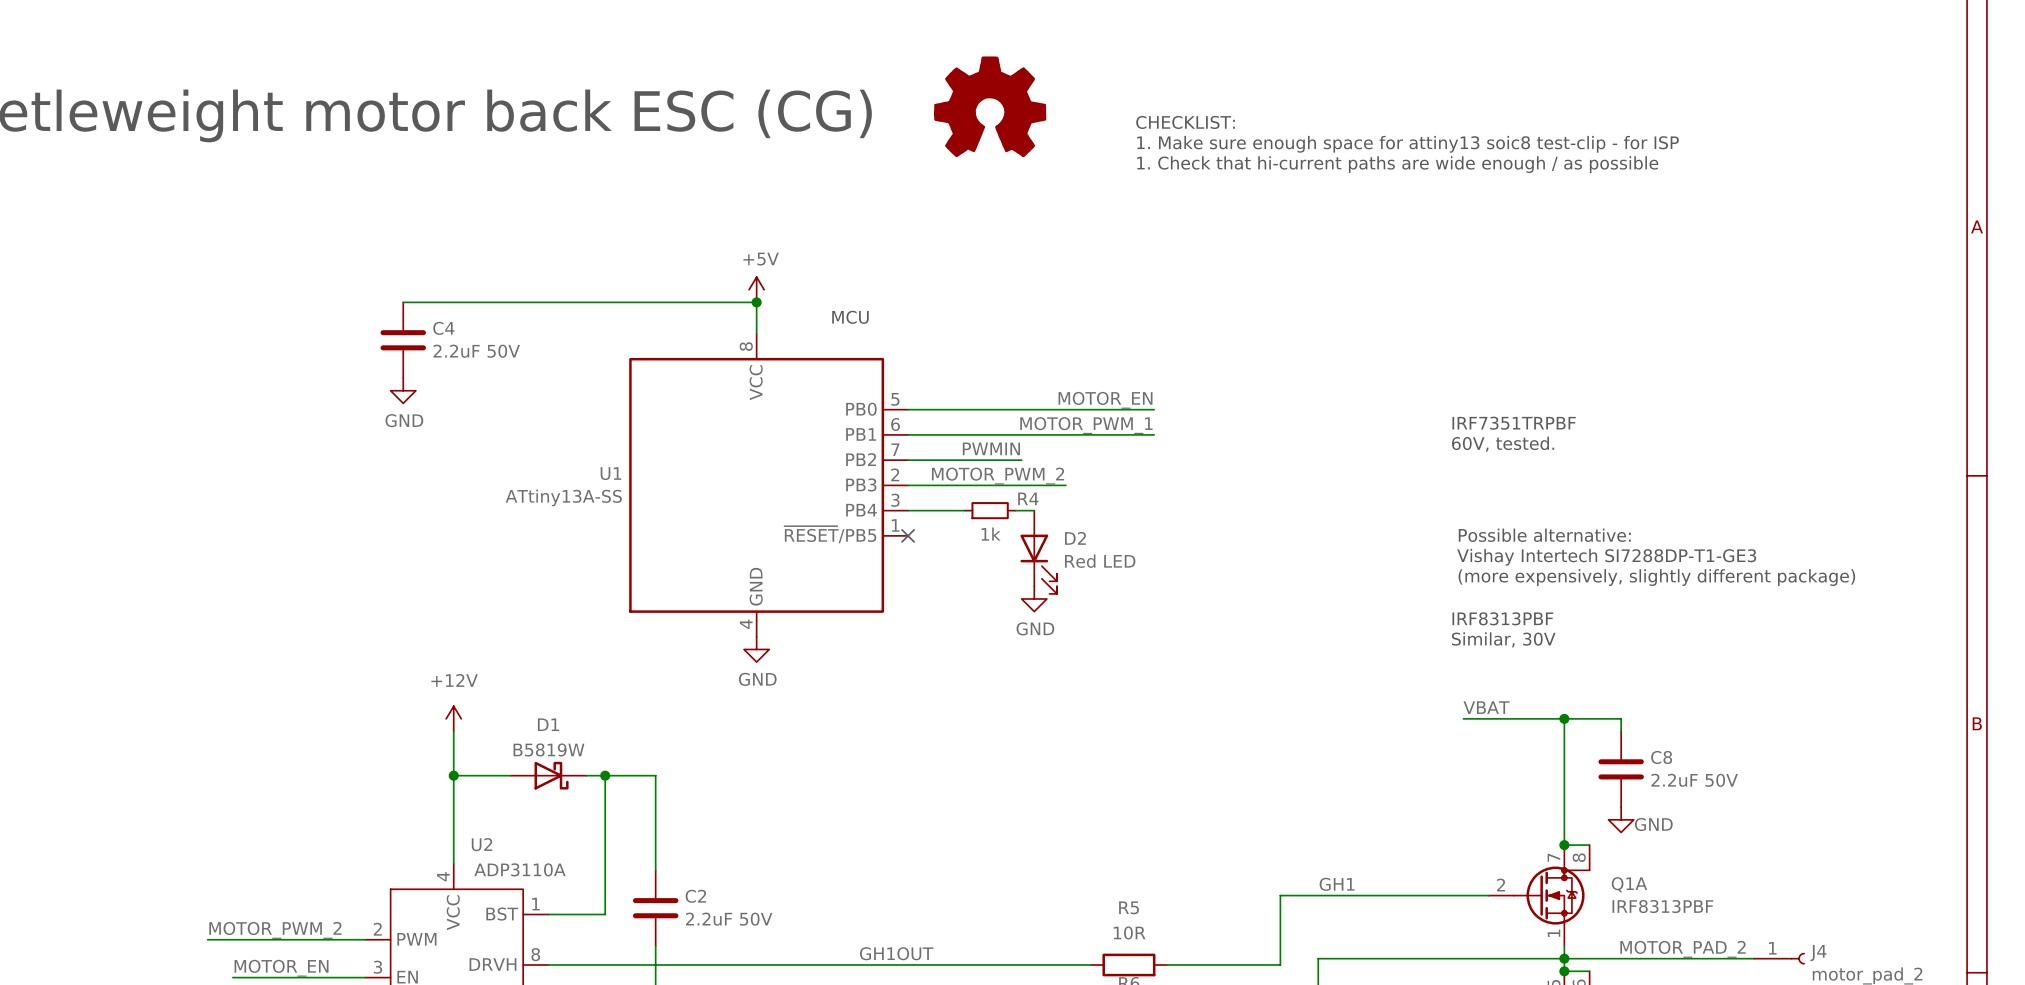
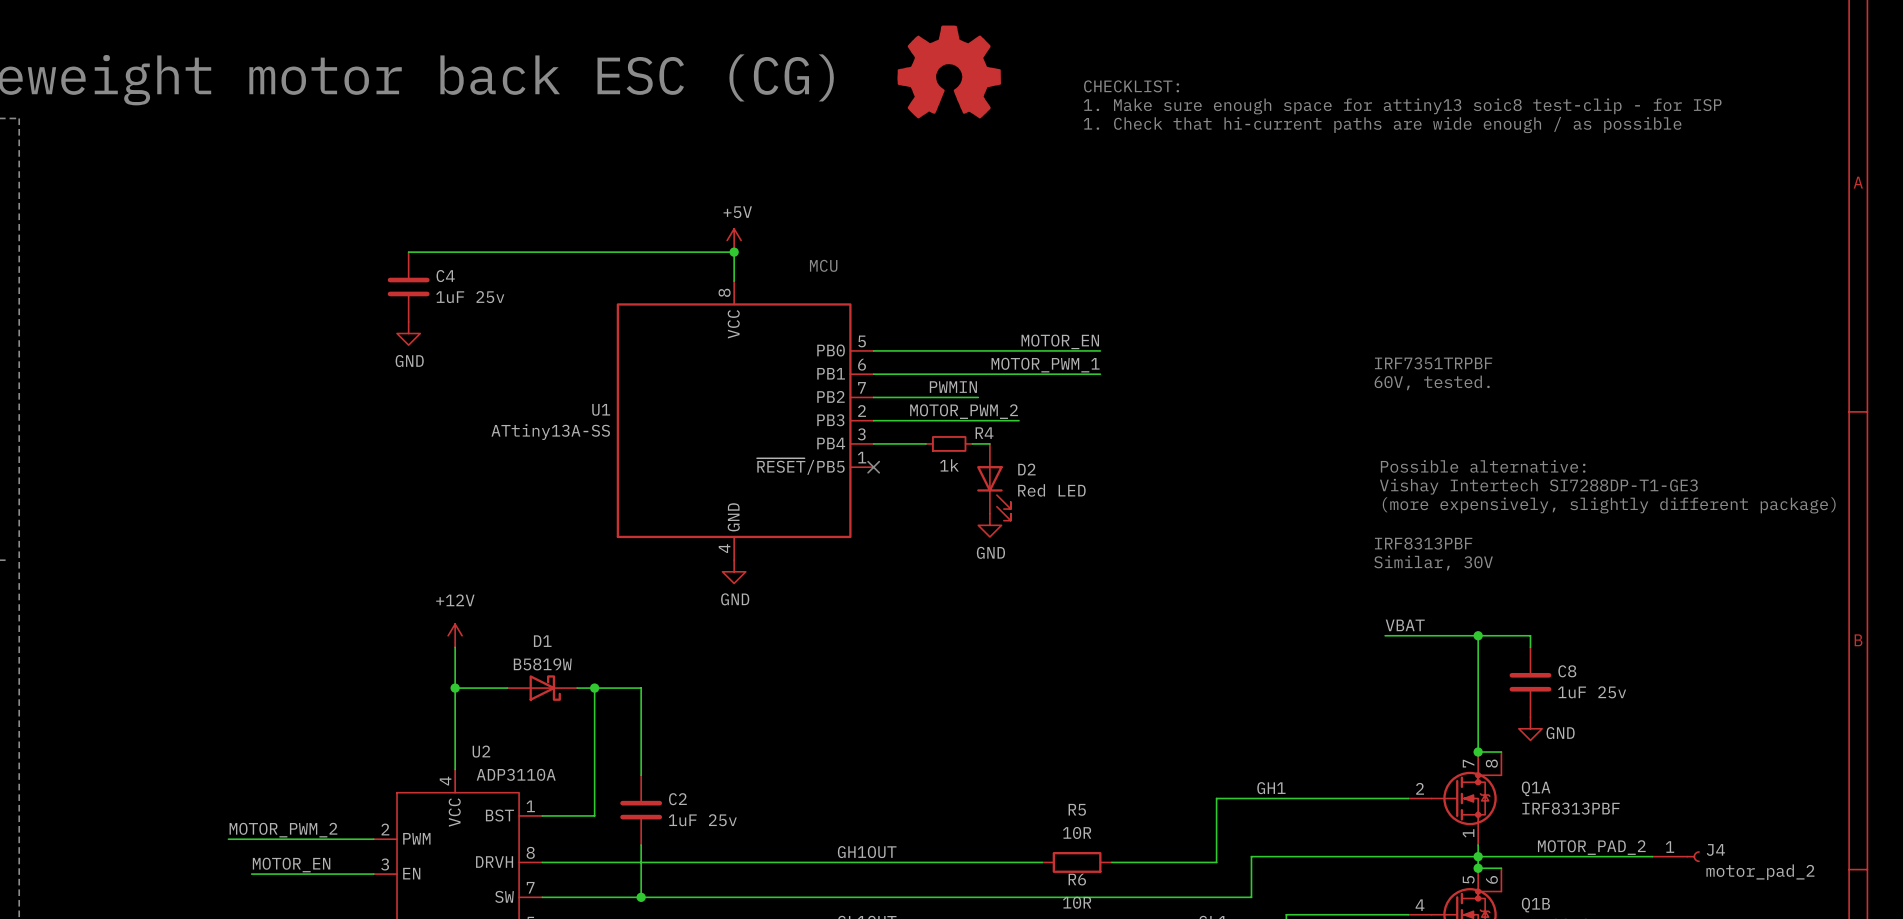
C4 value: 2.2uF 50V (476, 351) -> 1uF 25v (470, 297)
C8 value: 2.2uF 50V (1694, 780) -> 1uF 25v (1592, 692)
C2 value: 2.2uF 50V (729, 919) -> 1uF 25v (702, 820)

